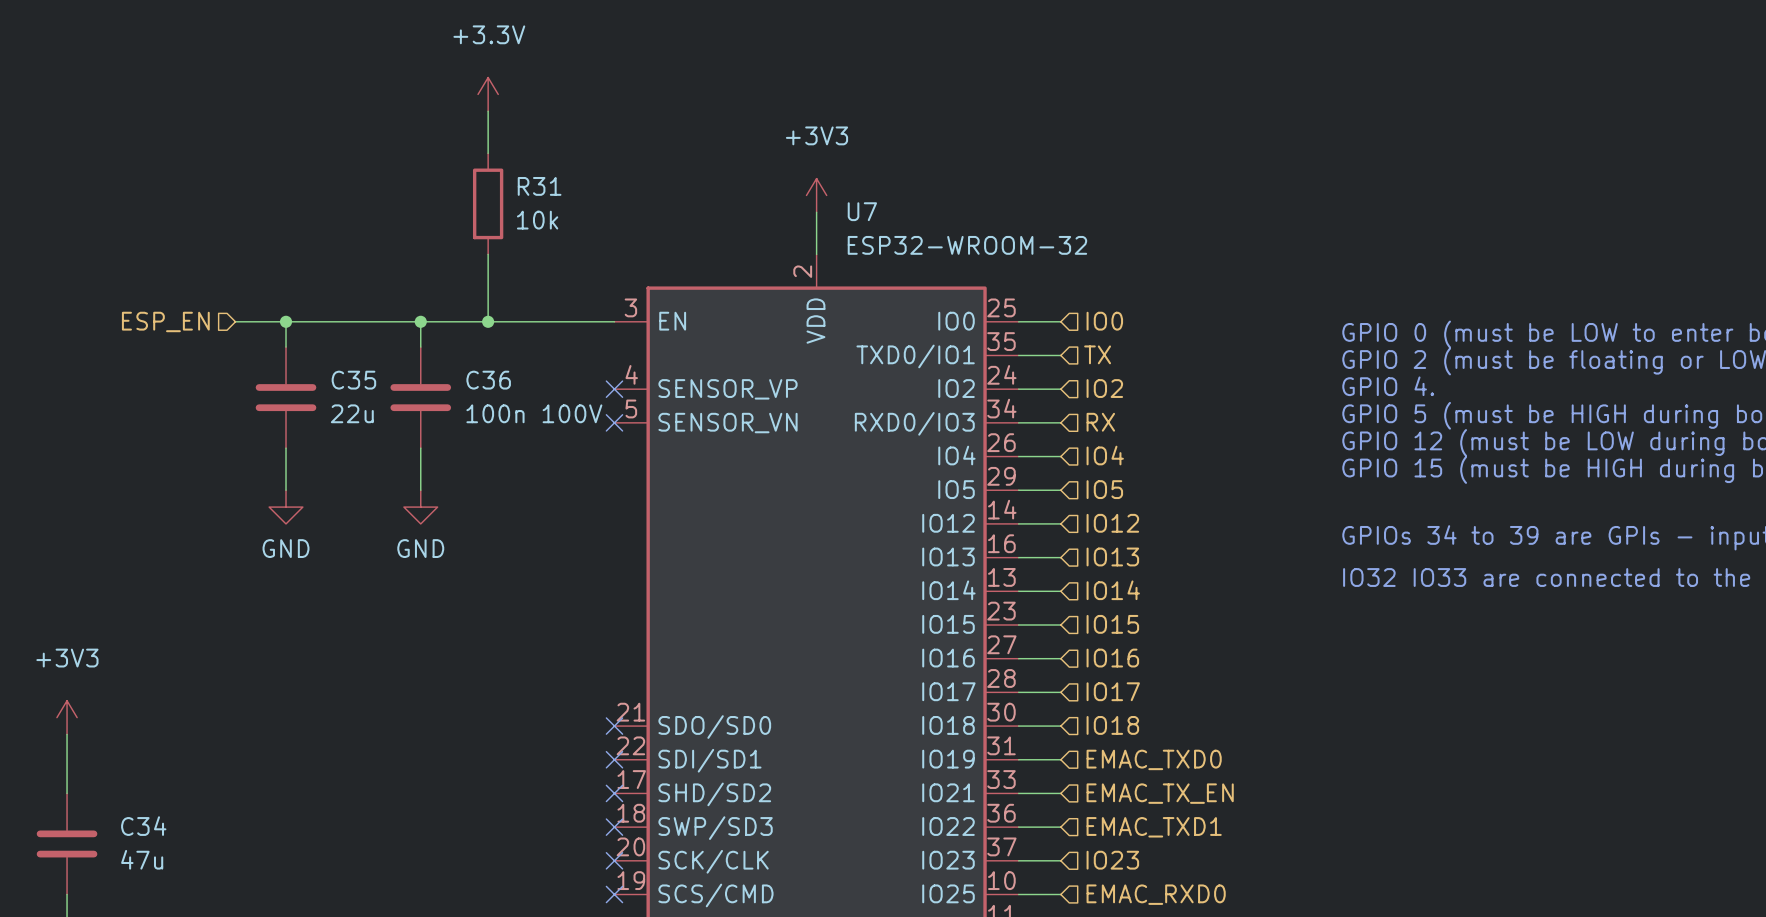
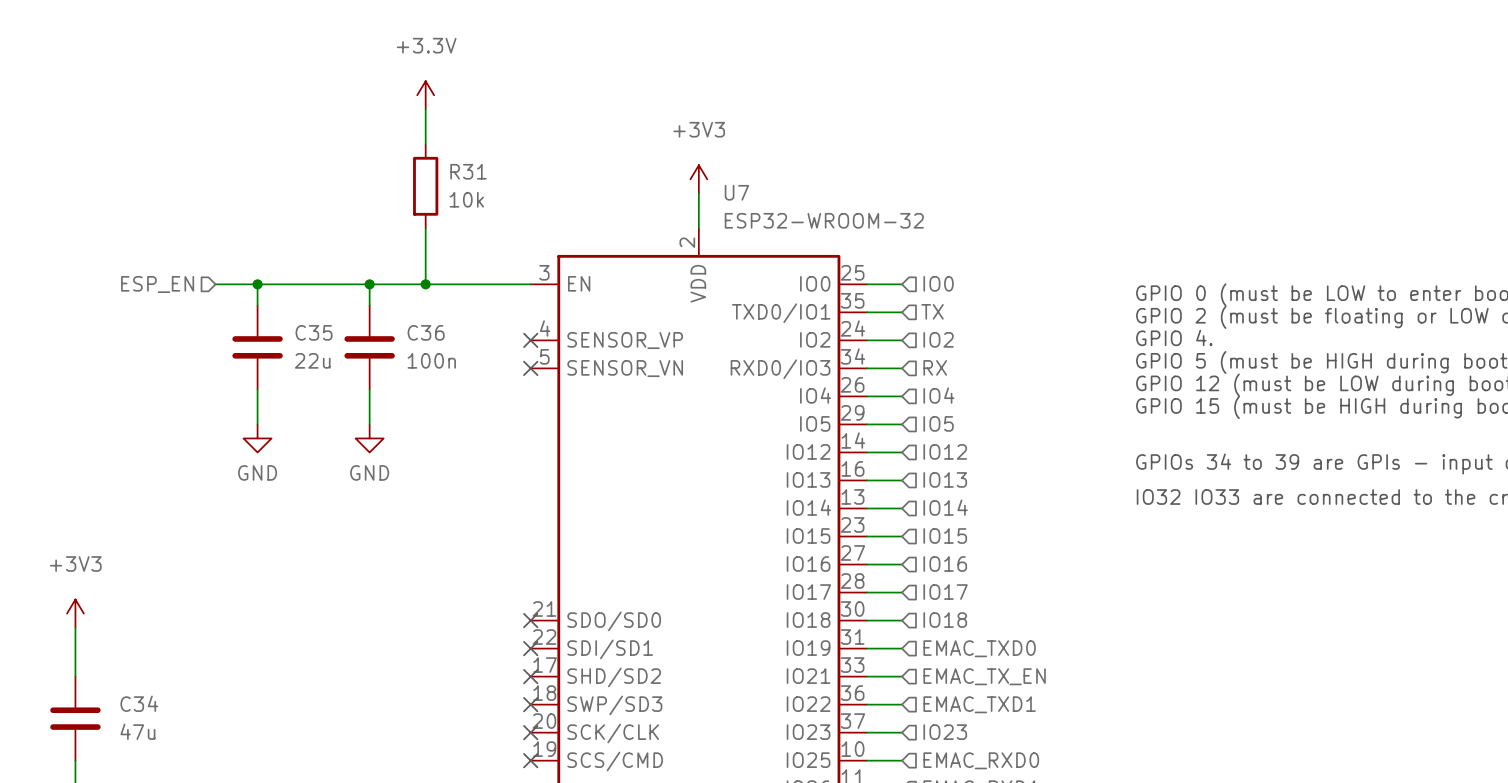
C36 value: 100n 100V (534, 413) -> 100n (431, 360)

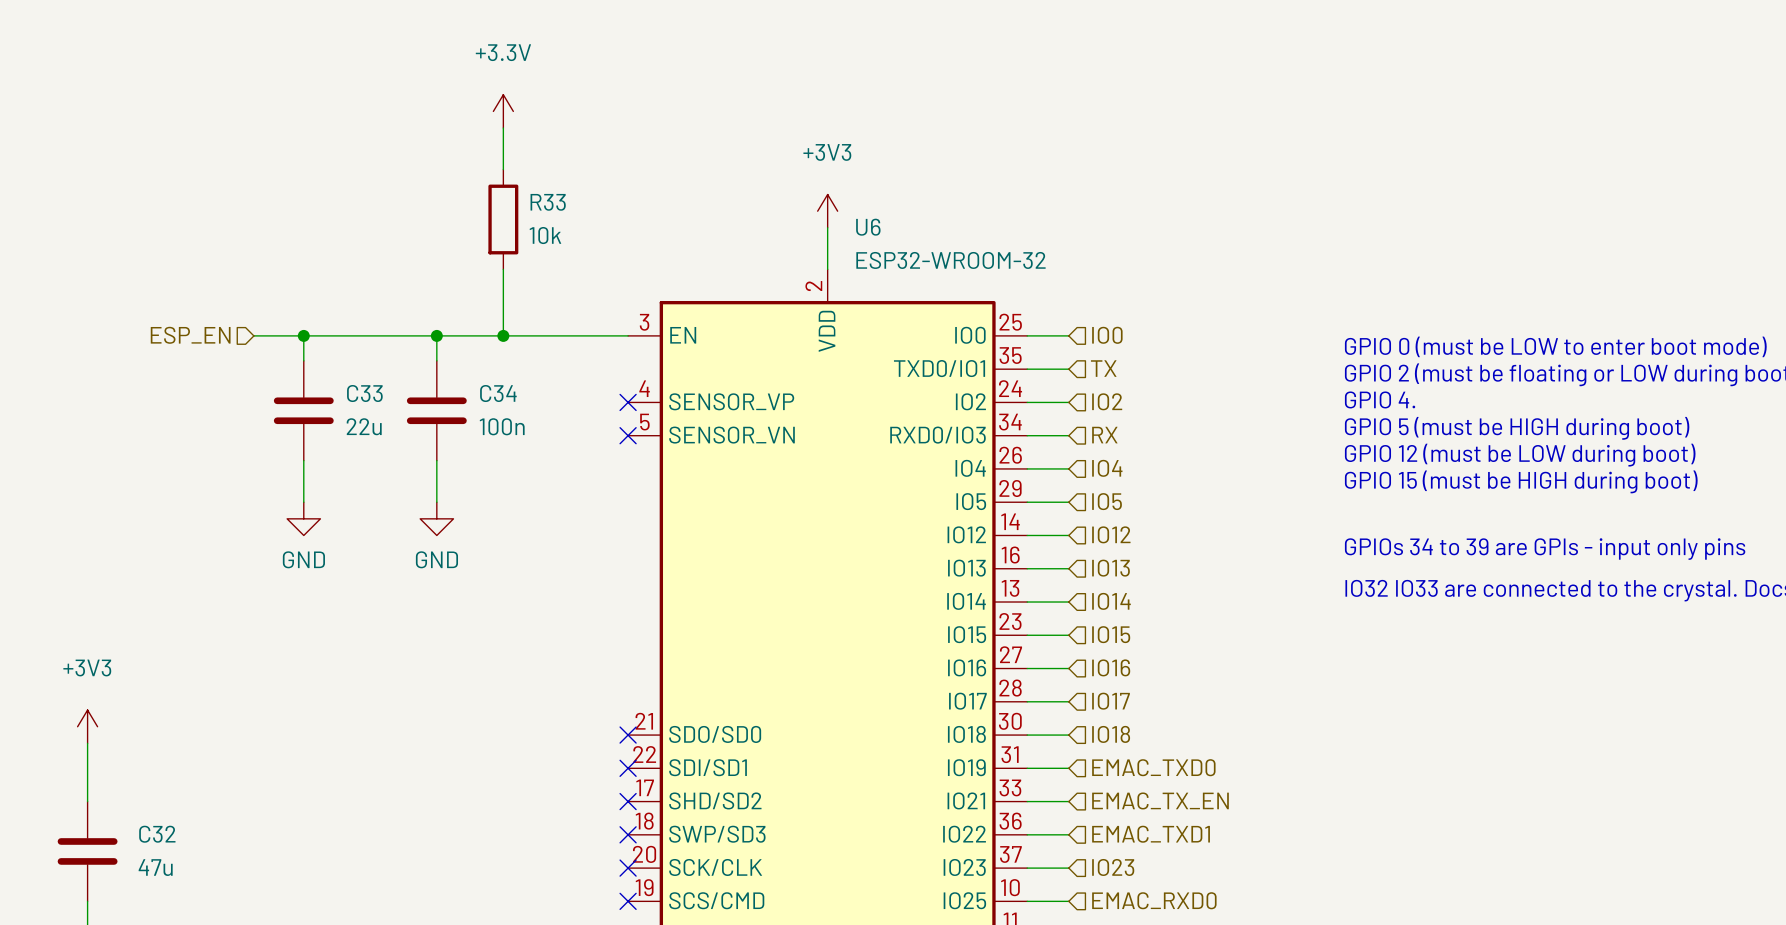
R31 name: R31 (468, 171) -> R33 (548, 202)
U7 name: U7 (736, 192) -> U6 (868, 227)
C35 name: C35 (314, 332) -> C33 (364, 393)
C36 name: C36 (426, 332) -> C34 (498, 393)
C34 name: C34 (139, 703) -> C32 (157, 834)

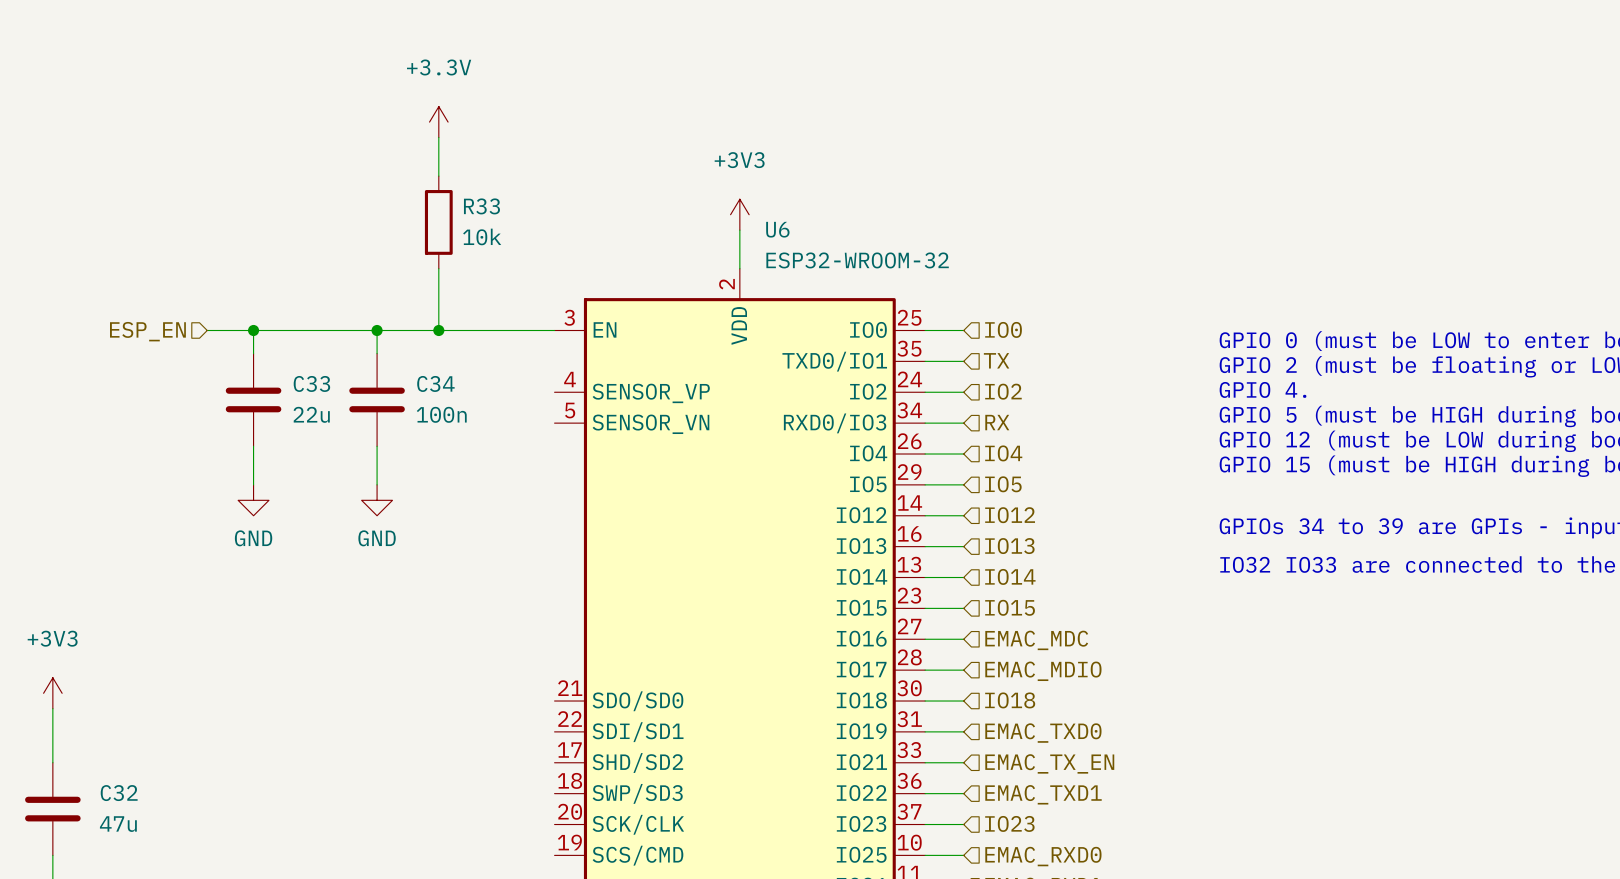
no-connect mark: (628, 402) -> none
no-connect mark: (628, 435) -> none
hierarchical label: IO16 (1111, 667) -> EMAC_MDC (1036, 640)
hierarchical label: IO17 (1111, 701) -> EMAC_MDIO (1043, 671)
no-connect mark: (628, 735) -> none
no-connect mark: (628, 768) -> none
no-connect mark: (628, 801) -> none
no-connect mark: (628, 834) -> none
no-connect mark: (628, 868) -> none
no-connect mark: (628, 901) -> none

